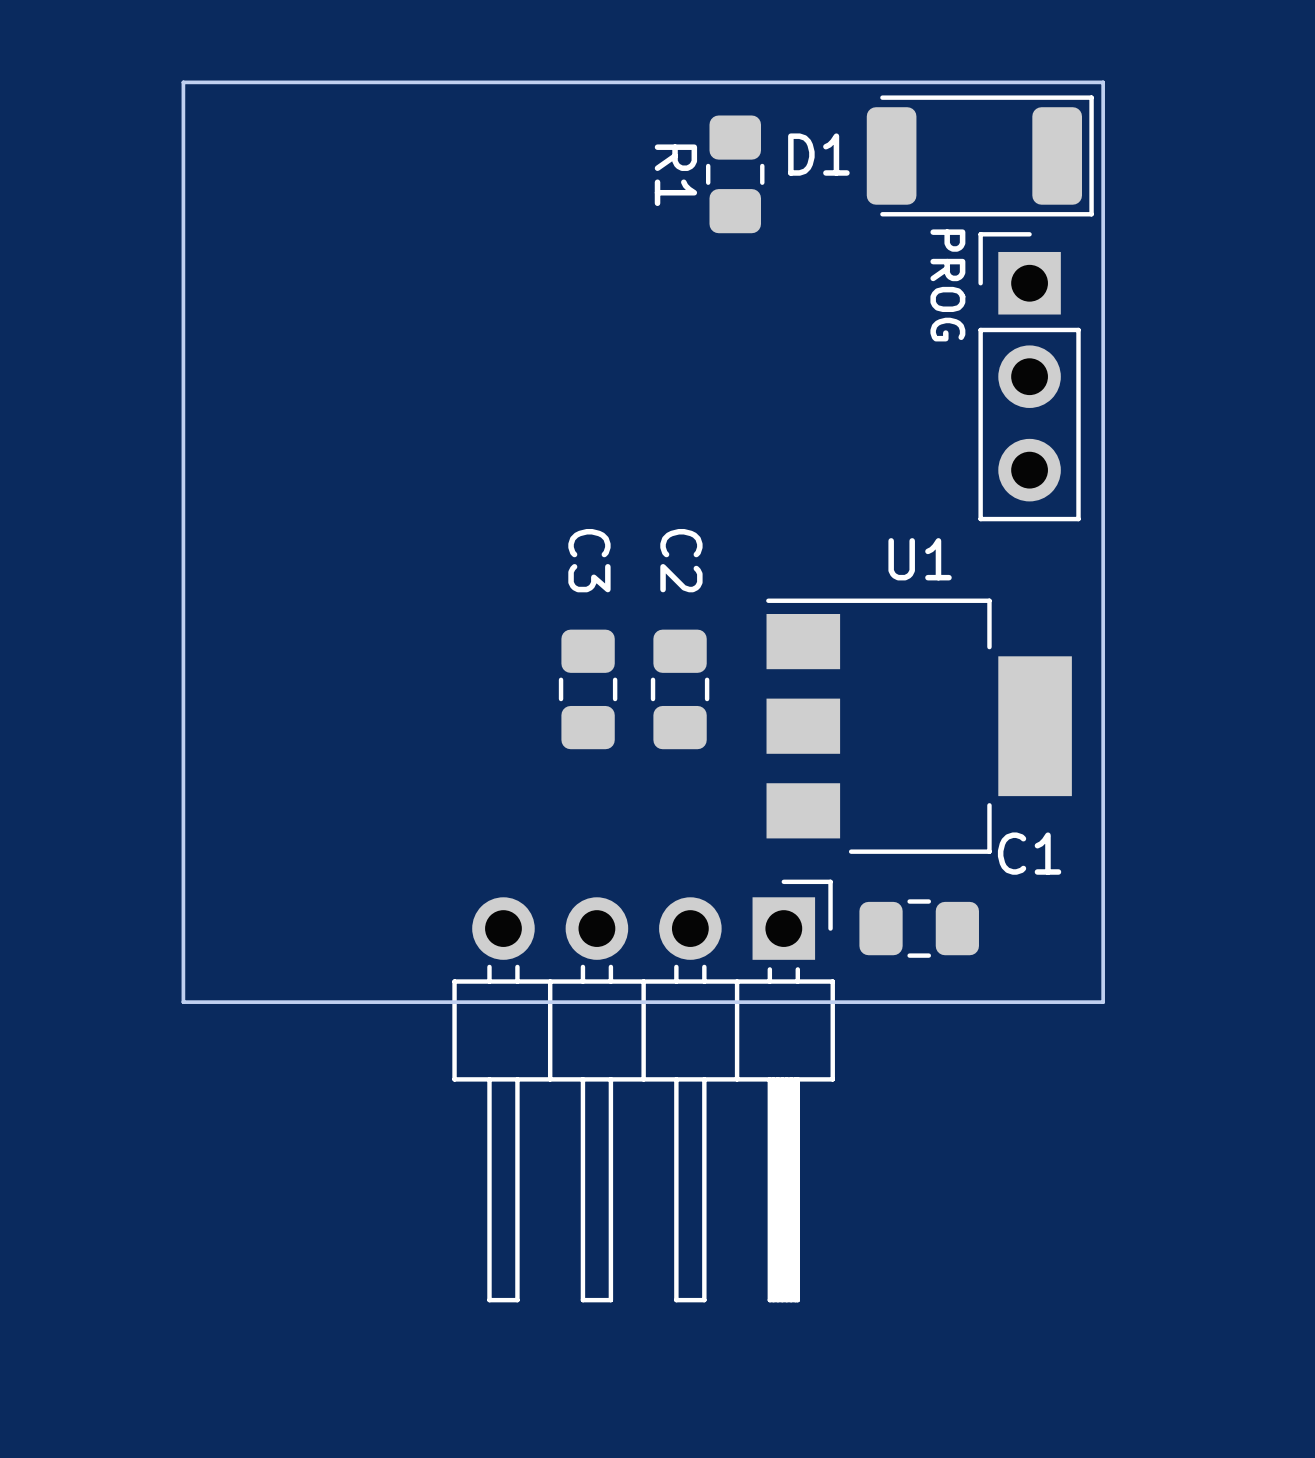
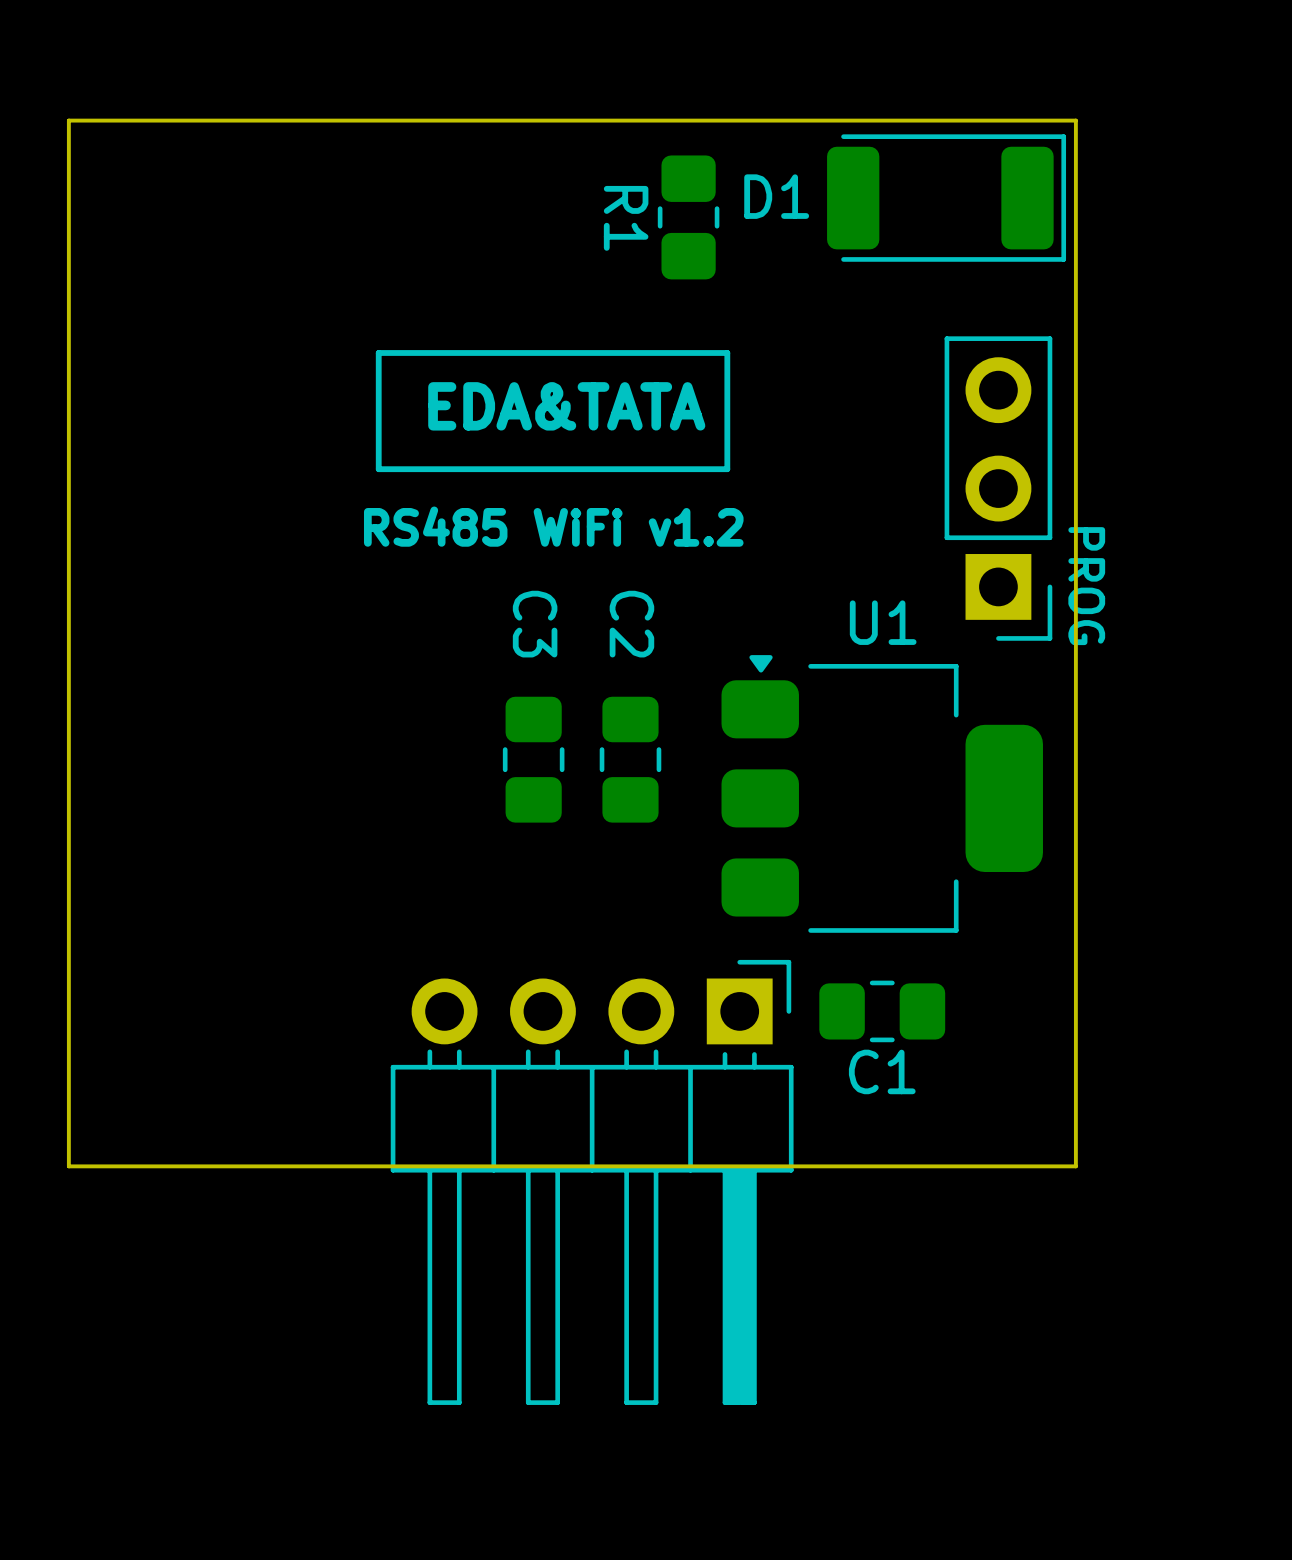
board edge: (183, 82) (183, 1002) (1103, 1002) -> (107, 120) (68, 120) (68, 1166) (1075, 1166) (1075, 1088)
line: none -> (727, 352) (378, 352) (378, 469) (727, 469) (727, 352)
text: none -> EDA&TATA (566, 406)
part rotation: 0° (1029, 376) -> 180° (998, 488)
text: none -> RS485 WiFi v1.2 (553, 526)
U1 footprint: [766, 598, 1072, 854] -> [721, 655, 1043, 933]
C1 name position: C1 (1029, 853) -> C1 (882, 1071)

